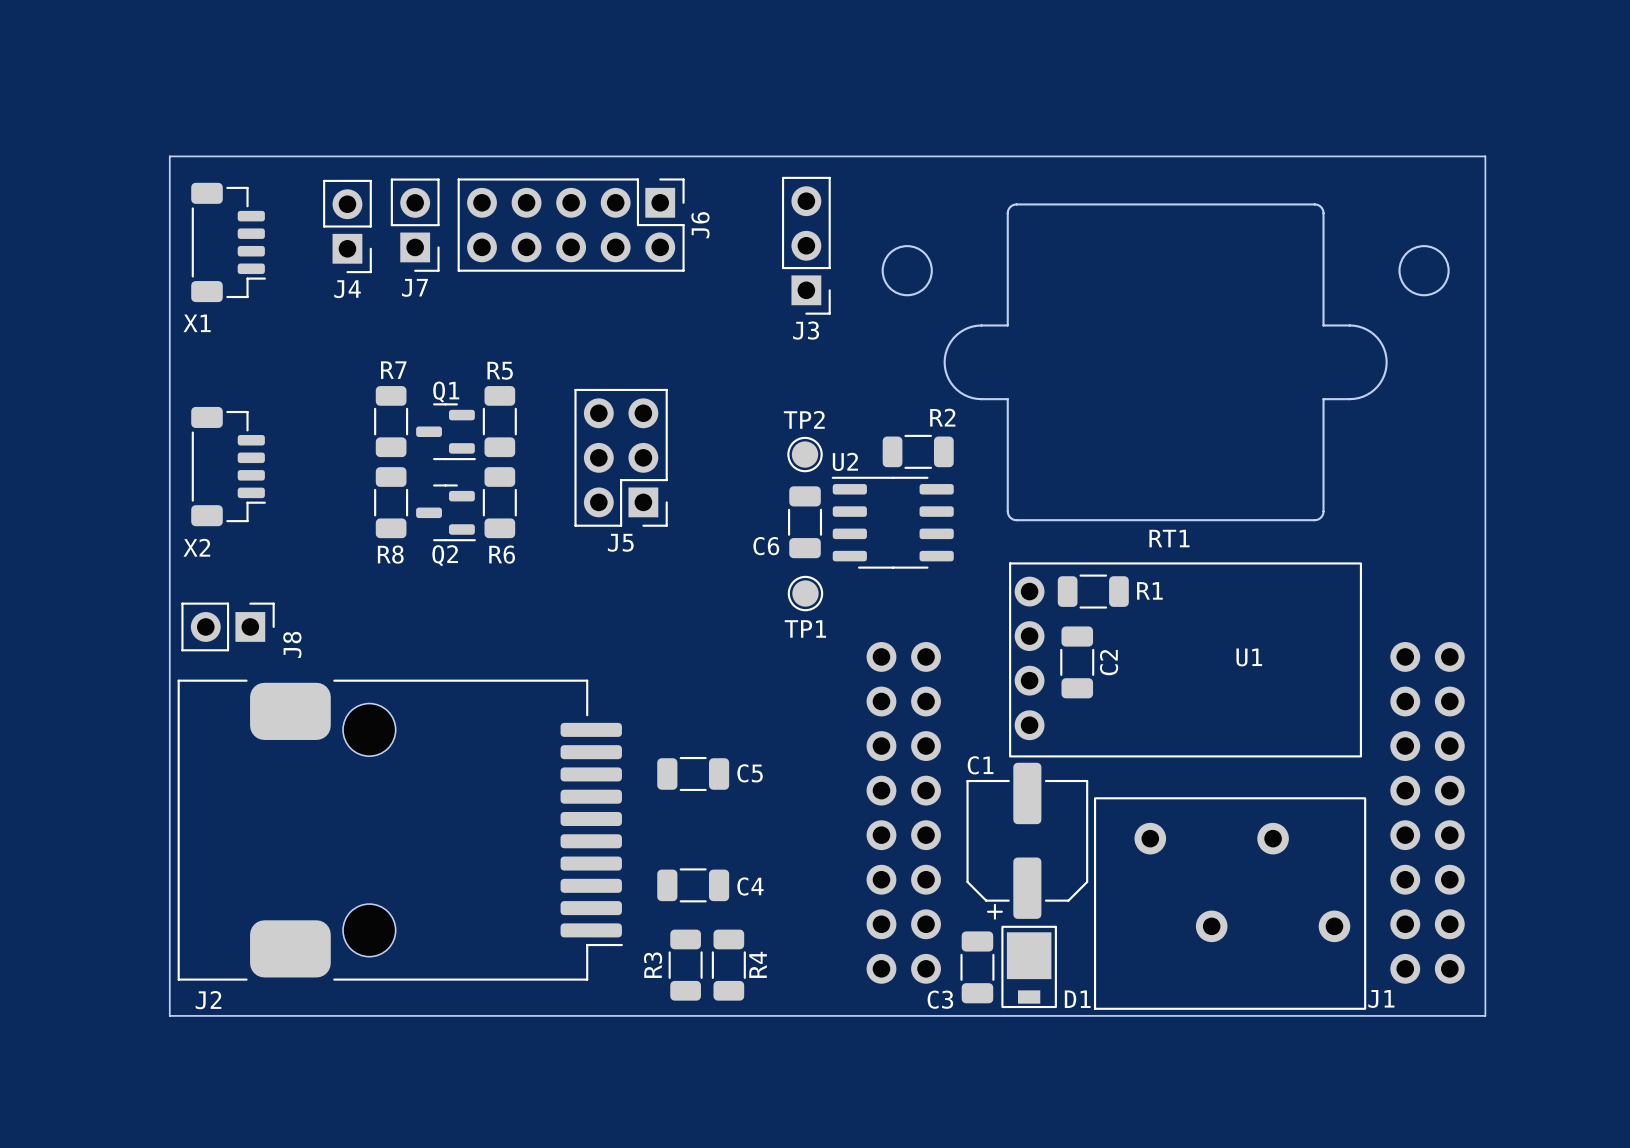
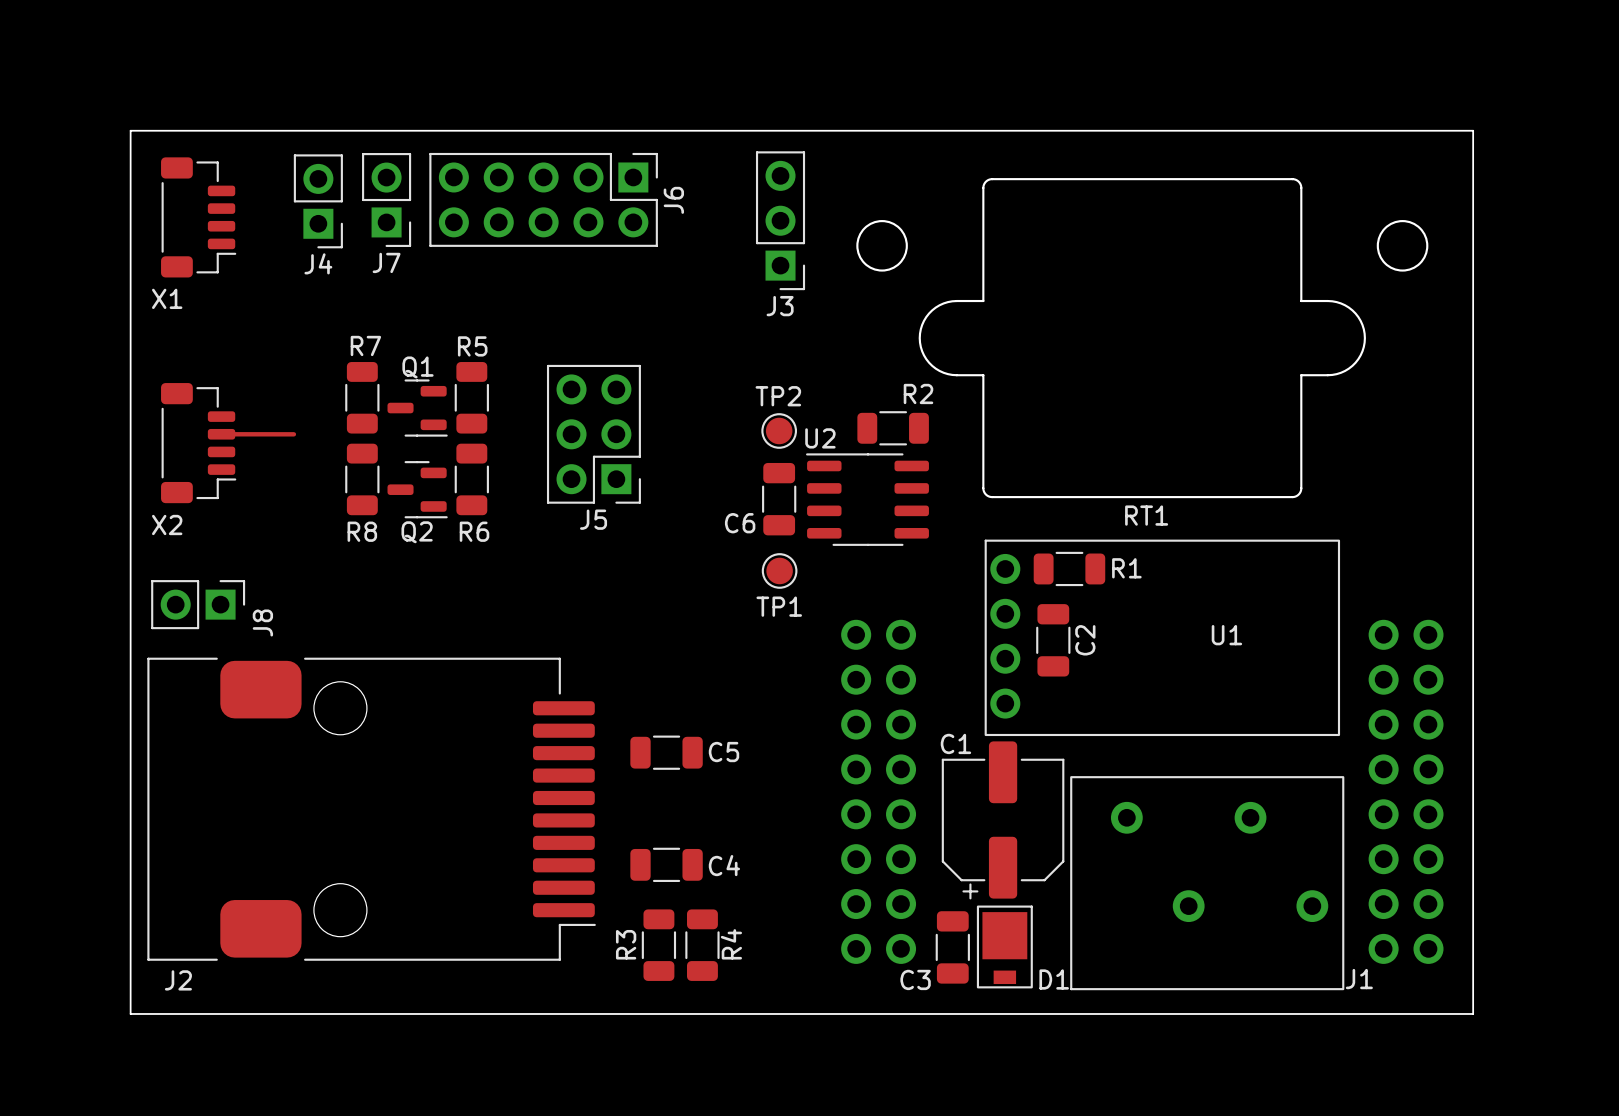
board edge: (169, 156) (169, 1015) (1485, 1015) (1485, 156) -> (139, 130) (130, 130) (130, 1013) (1473, 1013) (1473, 130) (1464, 130)
track: none -> (221, 434) (293, 434)

